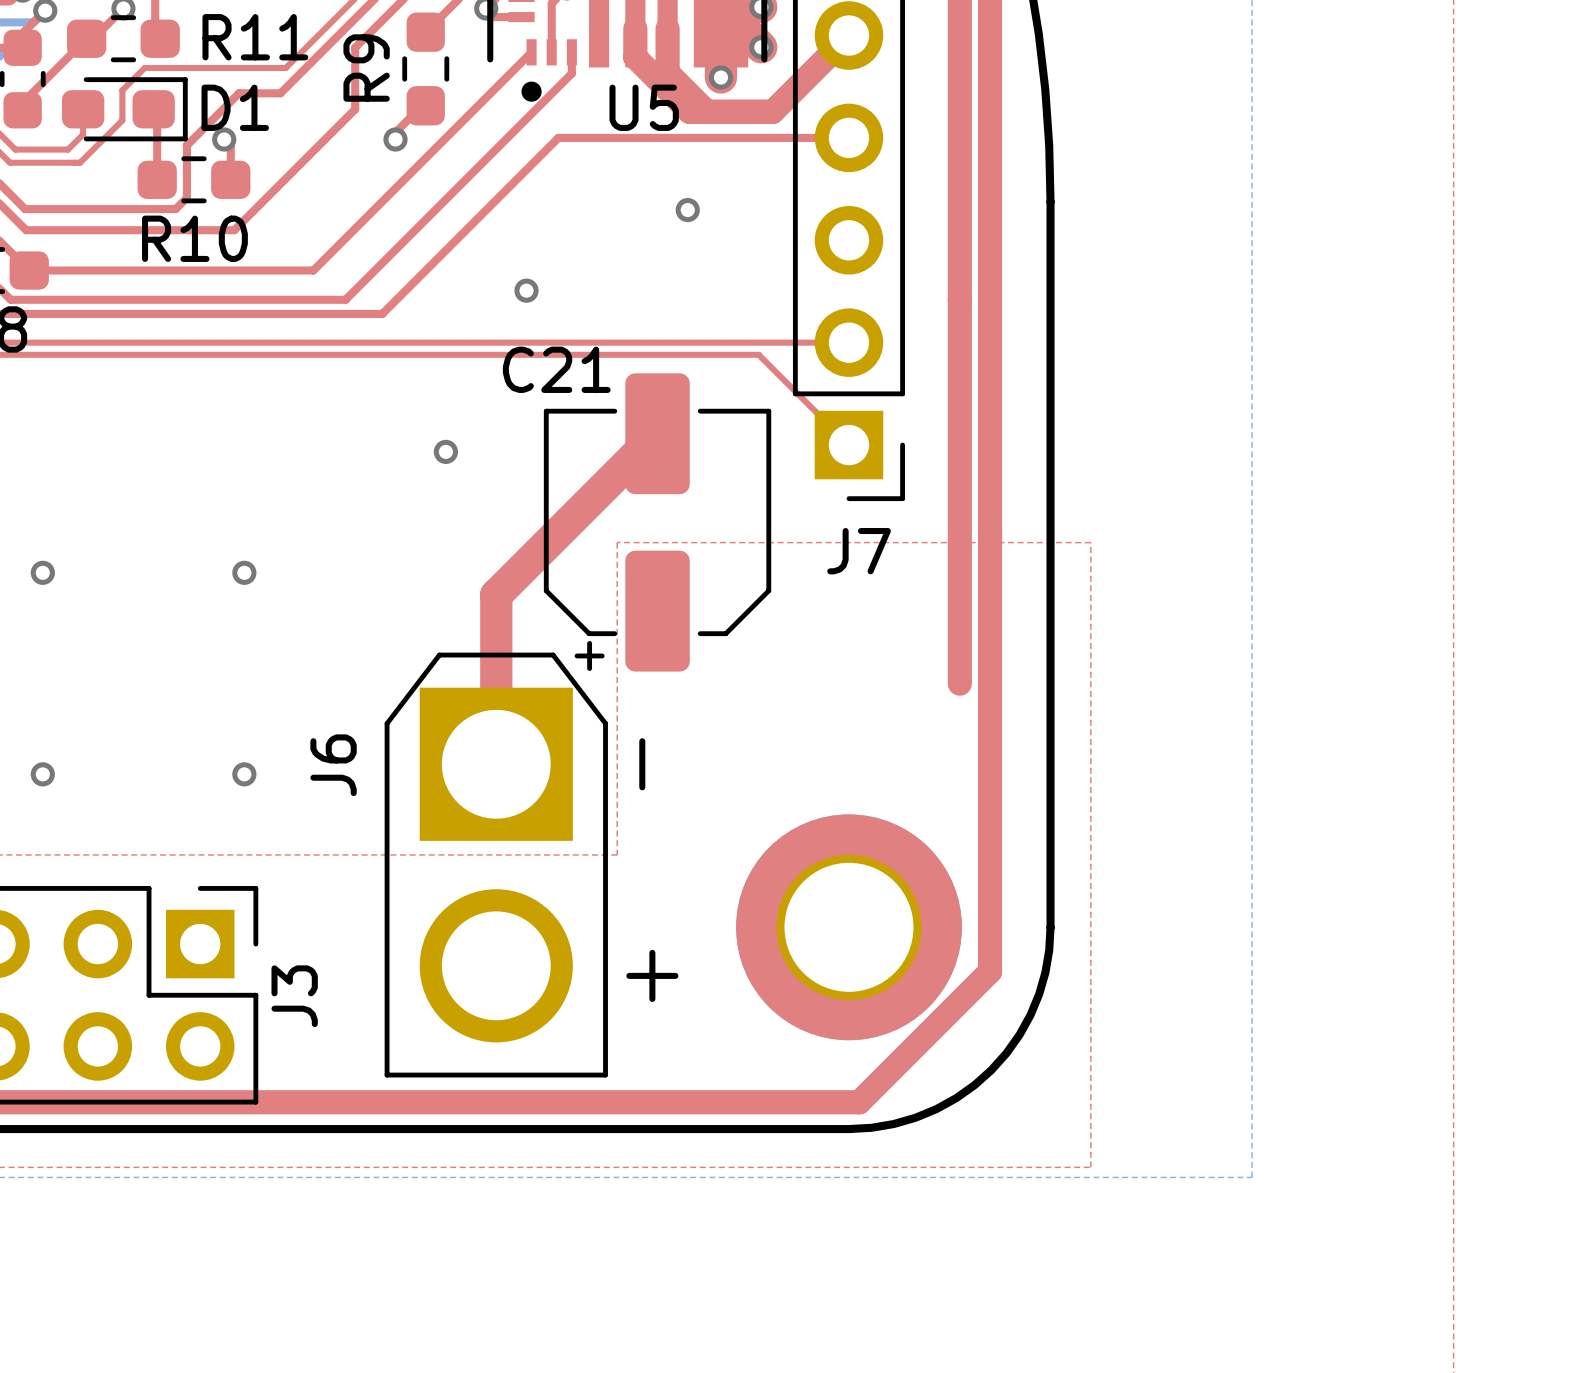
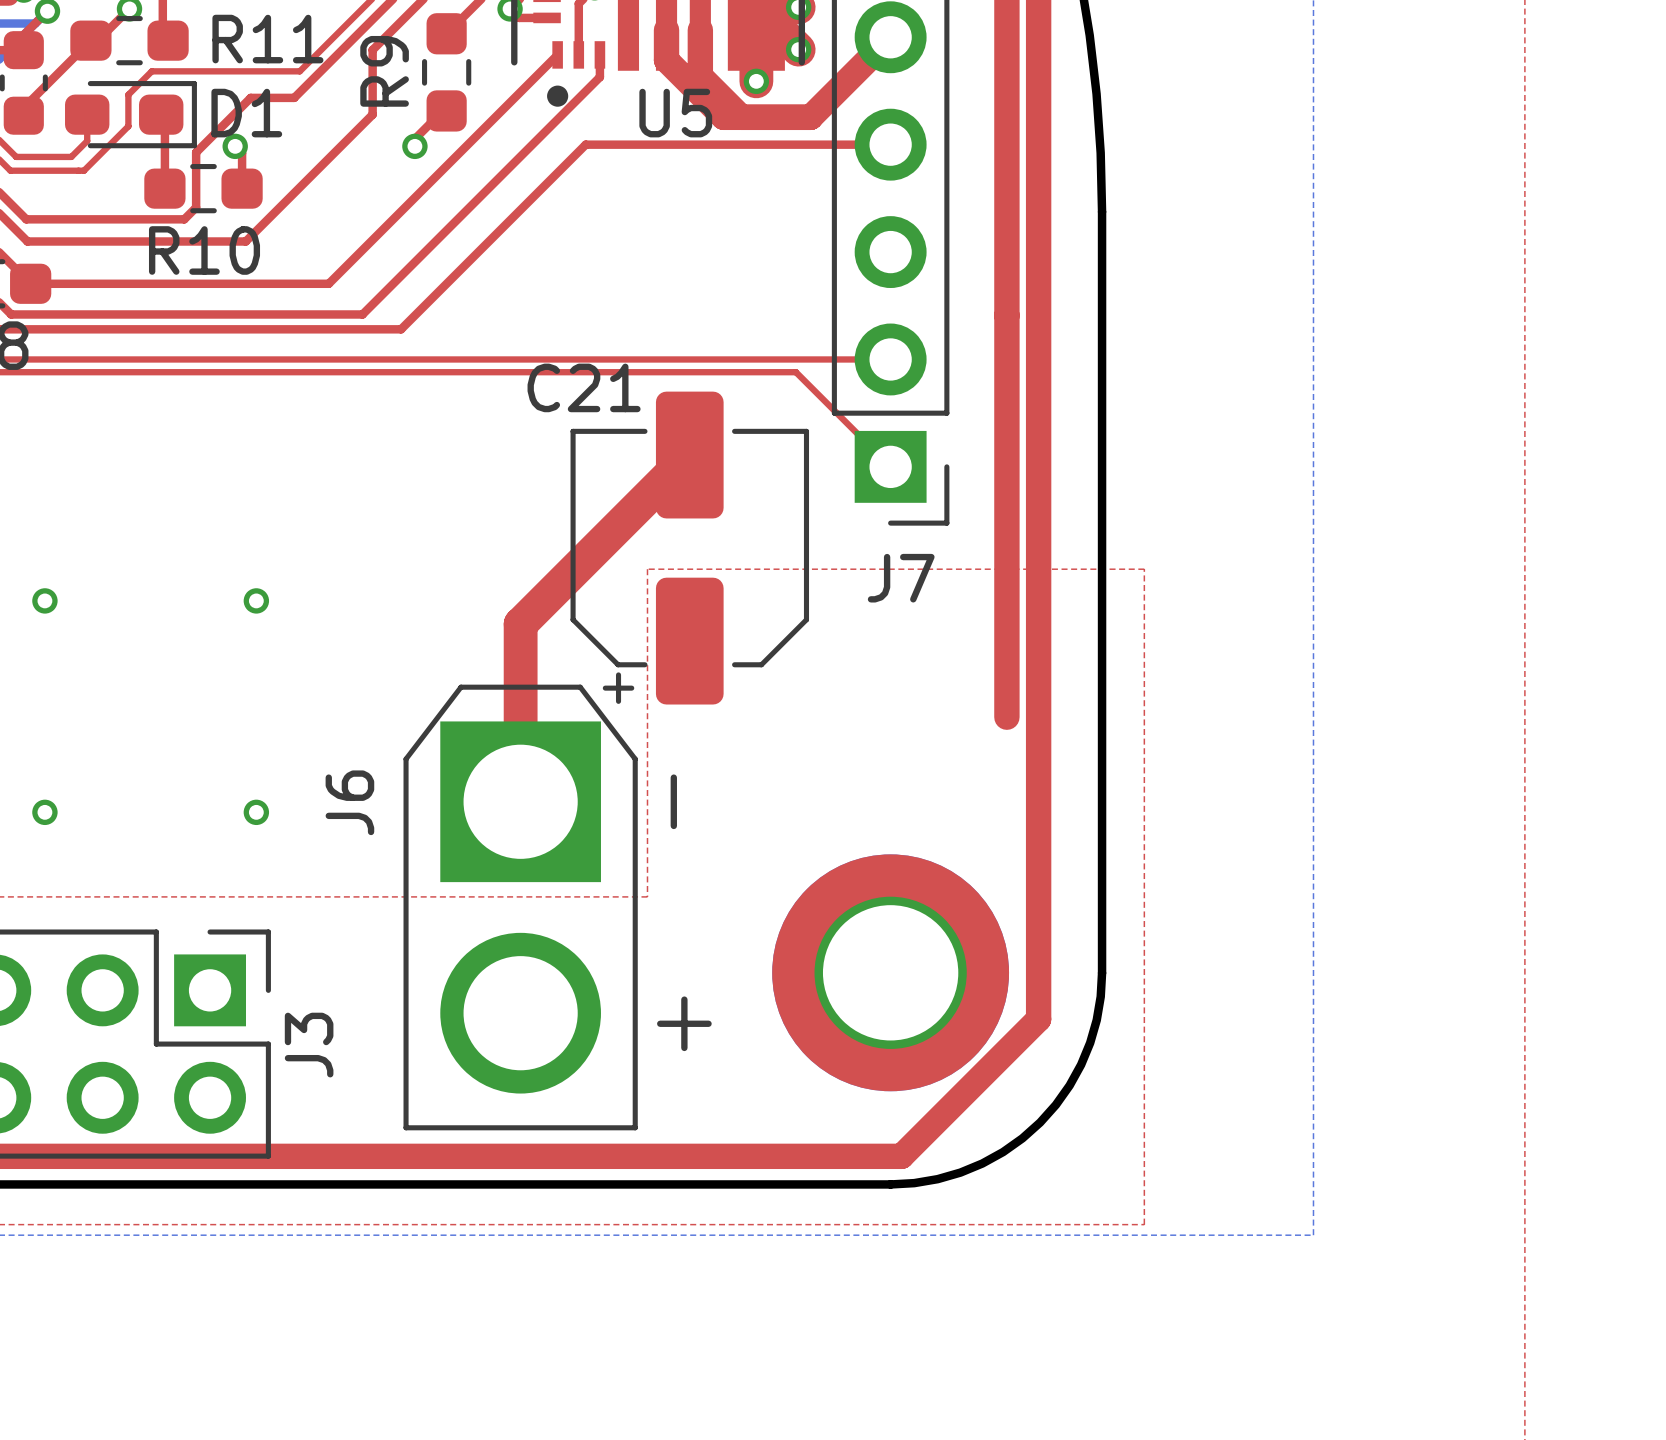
via: (687, 210) -> none
via: (526, 290) -> none
via: (445, 451) -> none

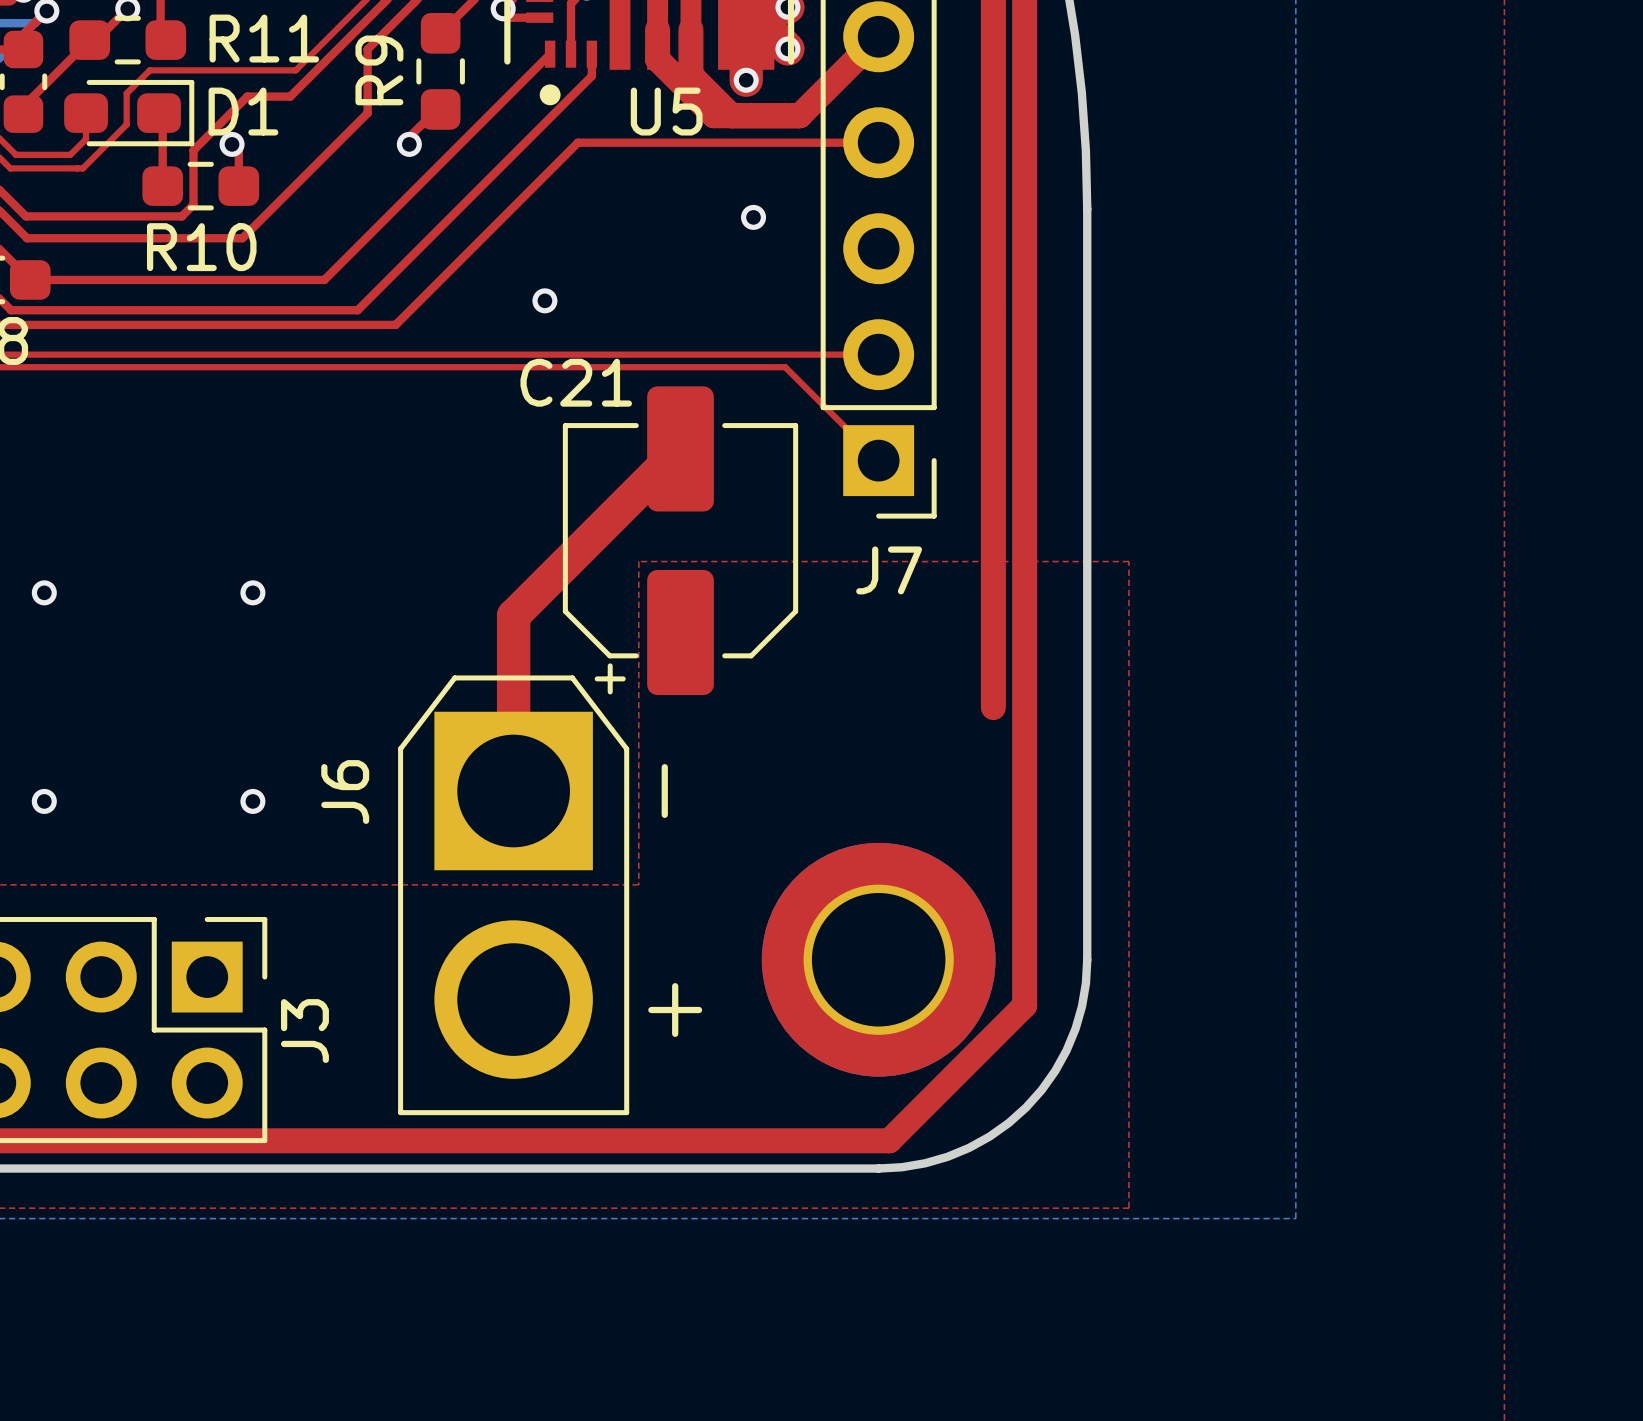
via: none -> (753, 217)
via: none -> (544, 300)

